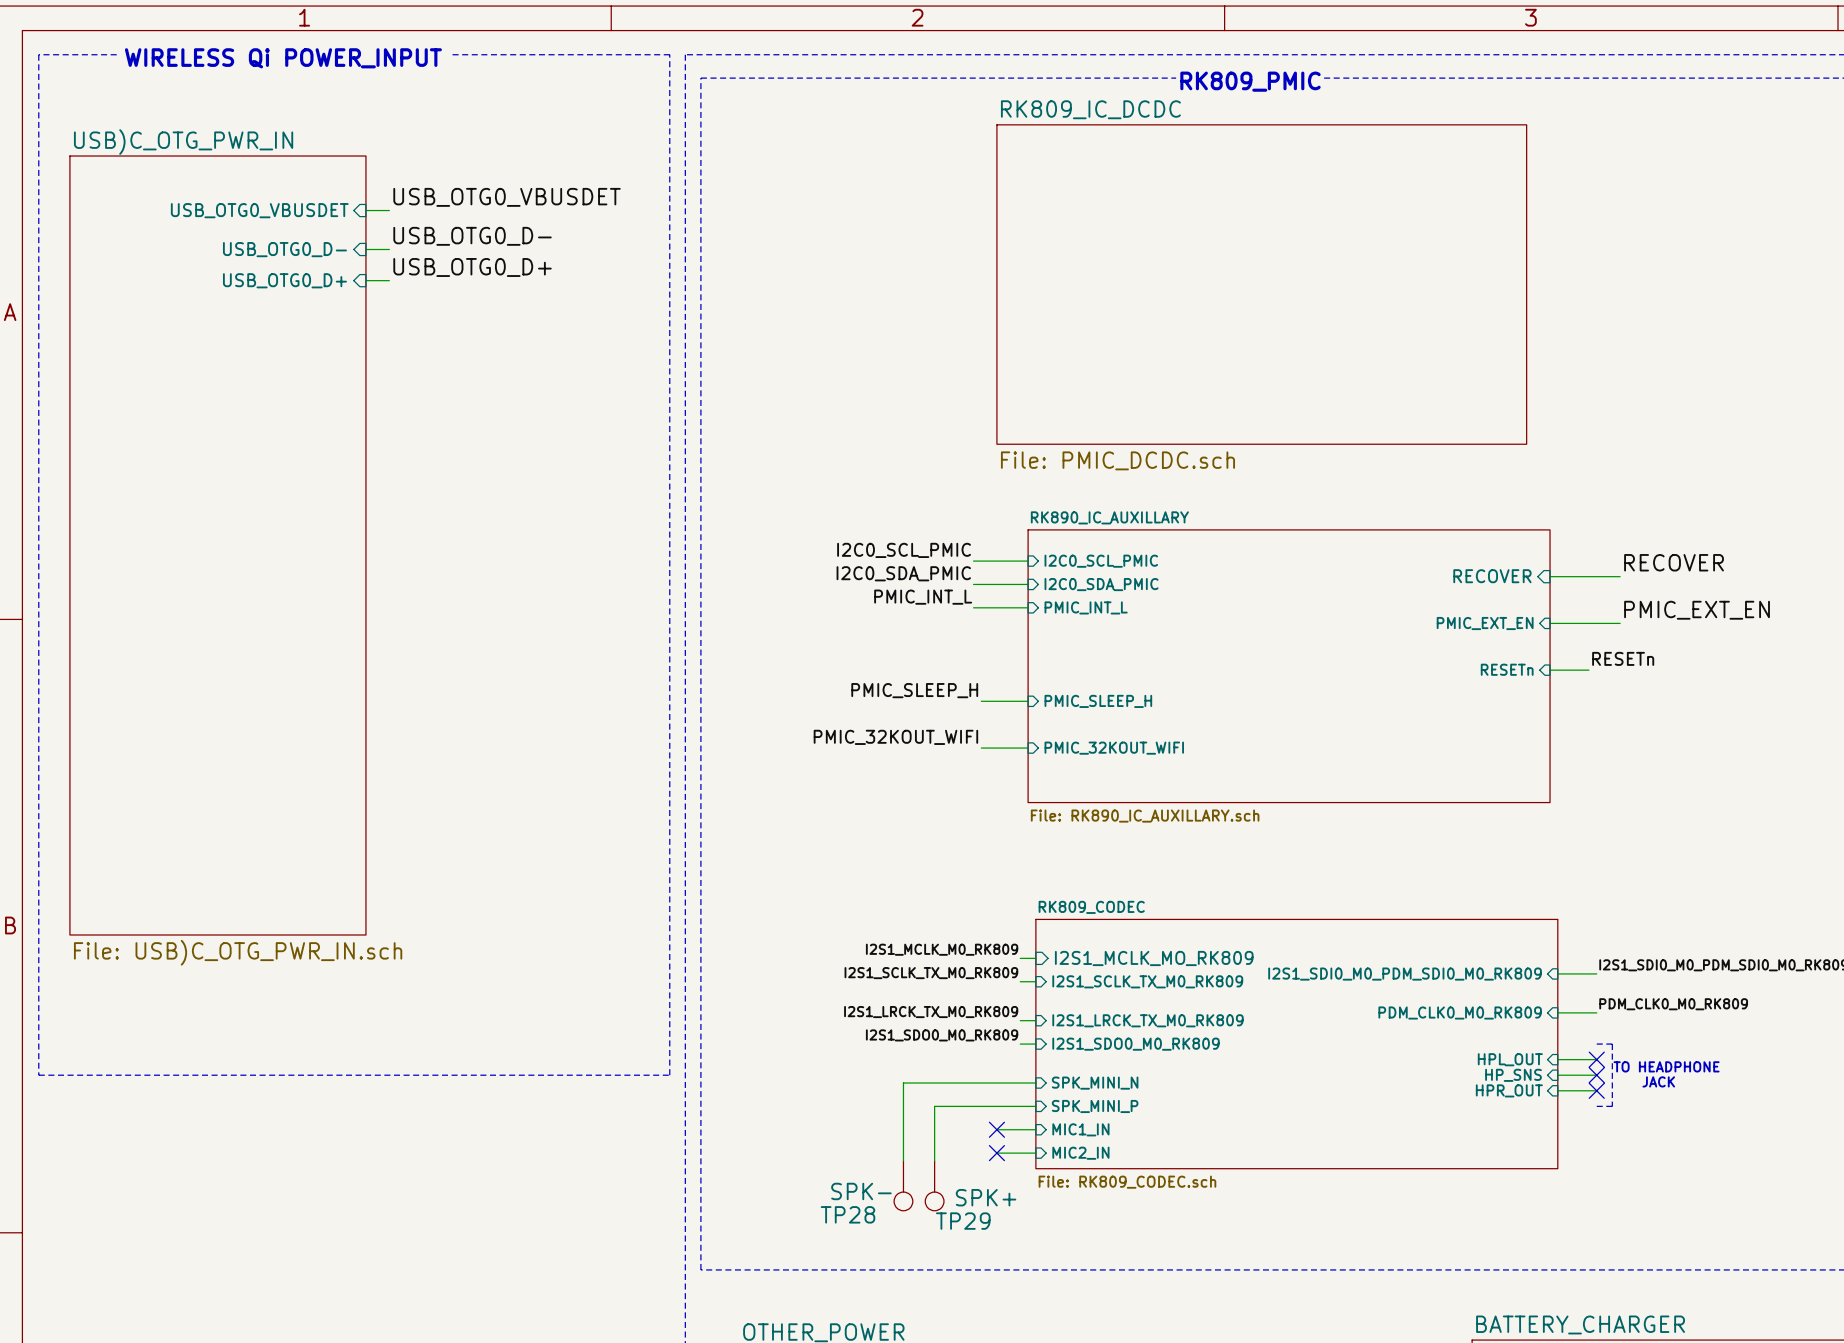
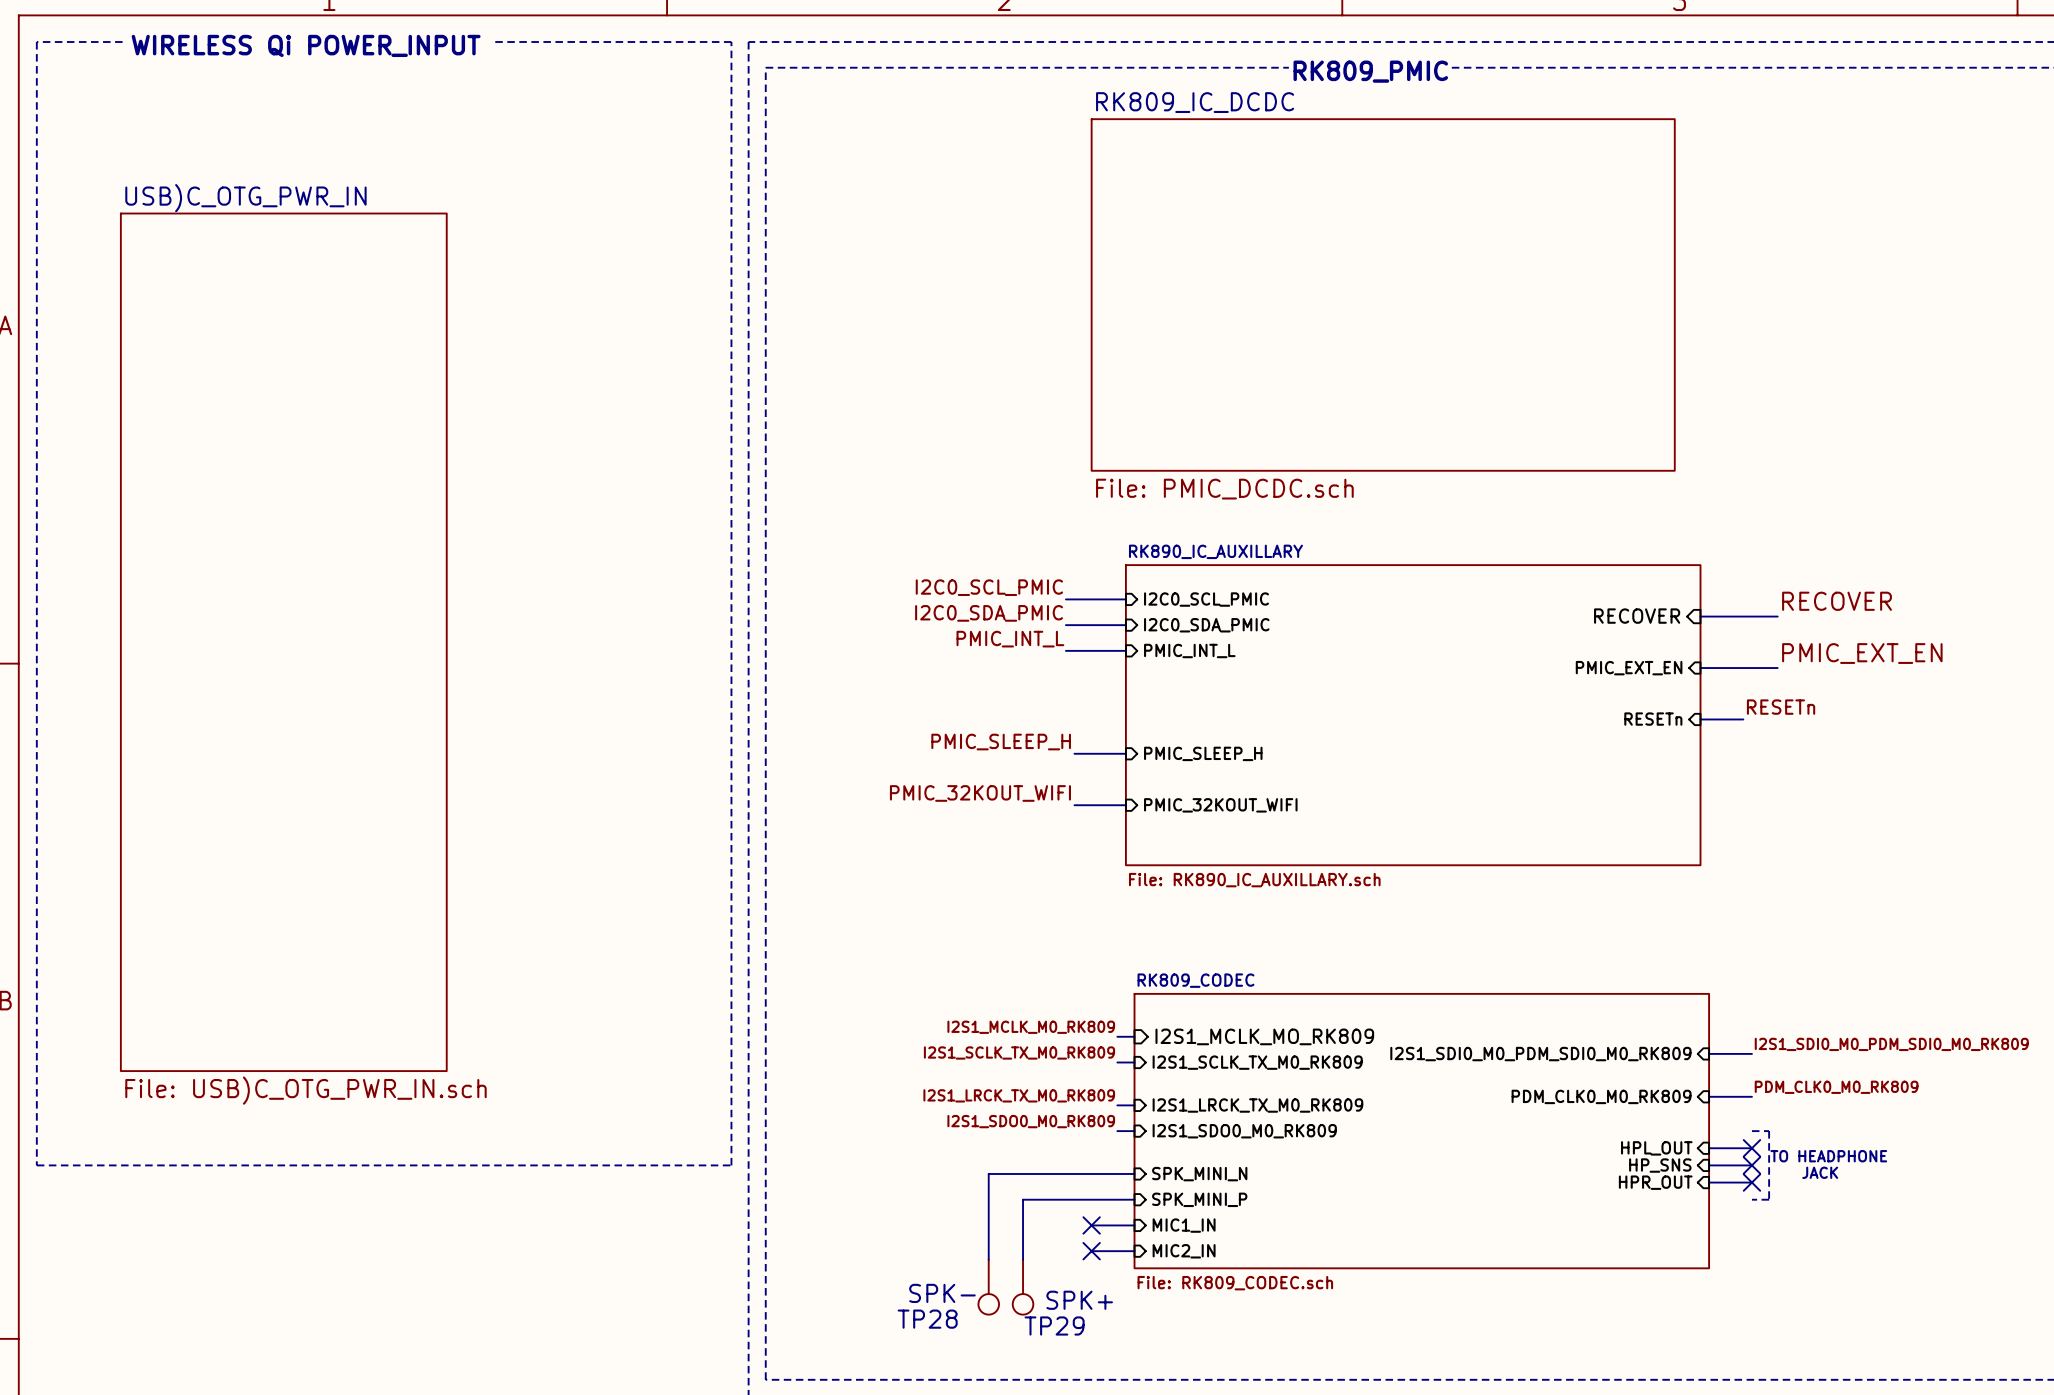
label: USB_OTG0_VBUSDET (507, 197) -> none
sheet pin: USB_OTG0_VBUSDET (259, 210) -> none
label: USB_OTG0_D- (472, 236) -> none
sheet pin: USB_OTG0_D- (284, 249) -> none
wire: (365, 249) (389, 249) -> none
label: USB_OTG0_D+ (472, 267) -> none
sheet pin: USB_OTG0_D+ (284, 280) -> none
wire: (365, 280) (389, 280) -> none
sheet USB)C_OTG_PWR_IN position: (217, 545) -> (283, 642)

